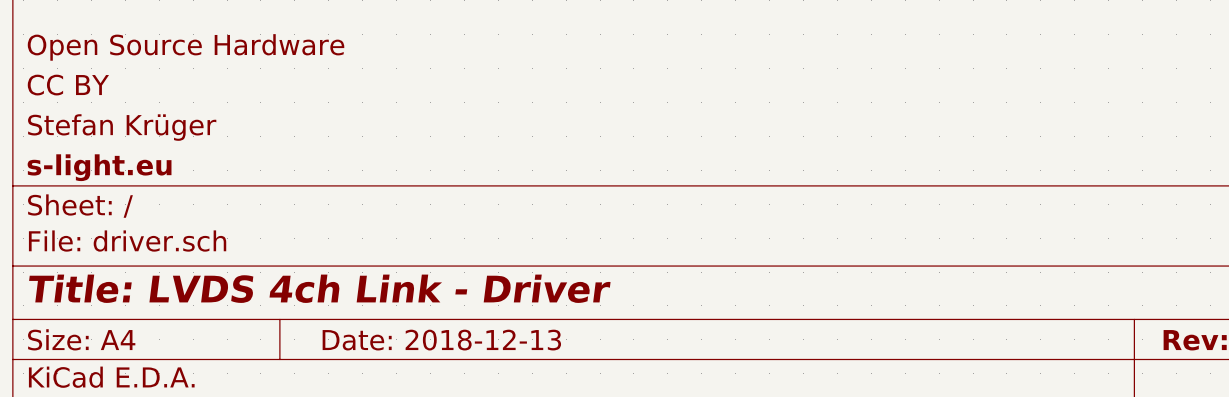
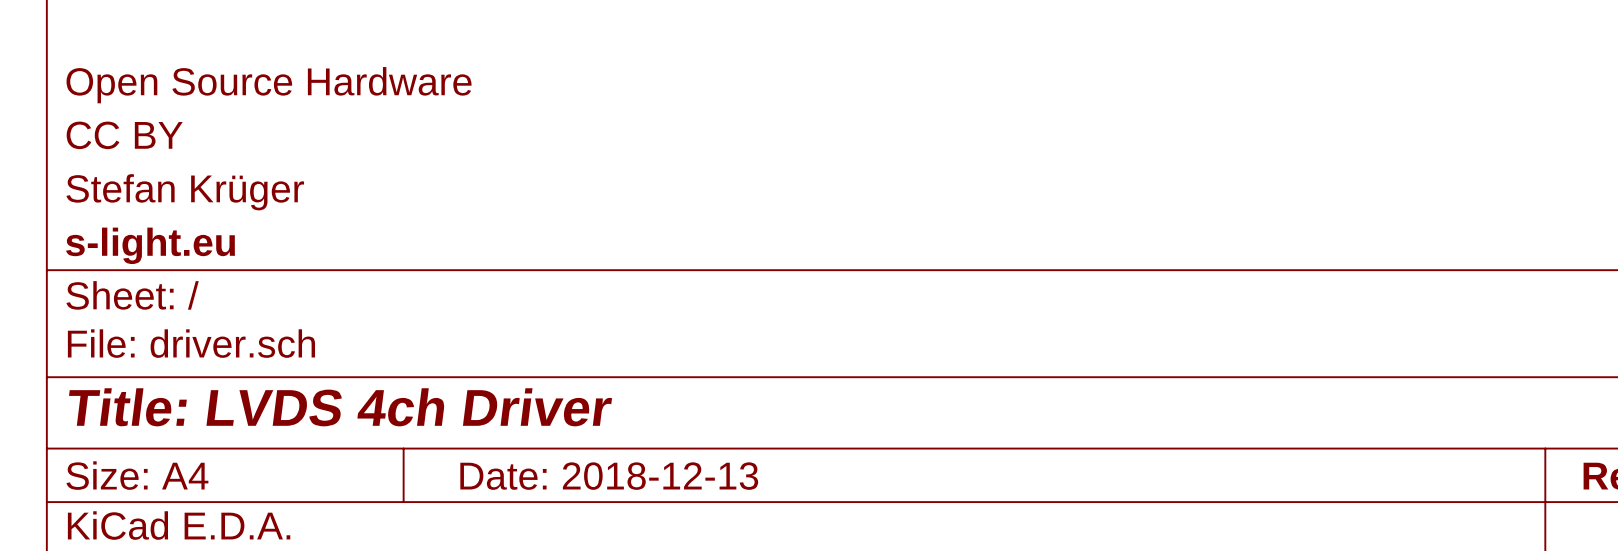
title block: Title: LVDS 4ch Link - Driver (319, 288) -> Title: LVDS 4ch Driver (340, 407)

